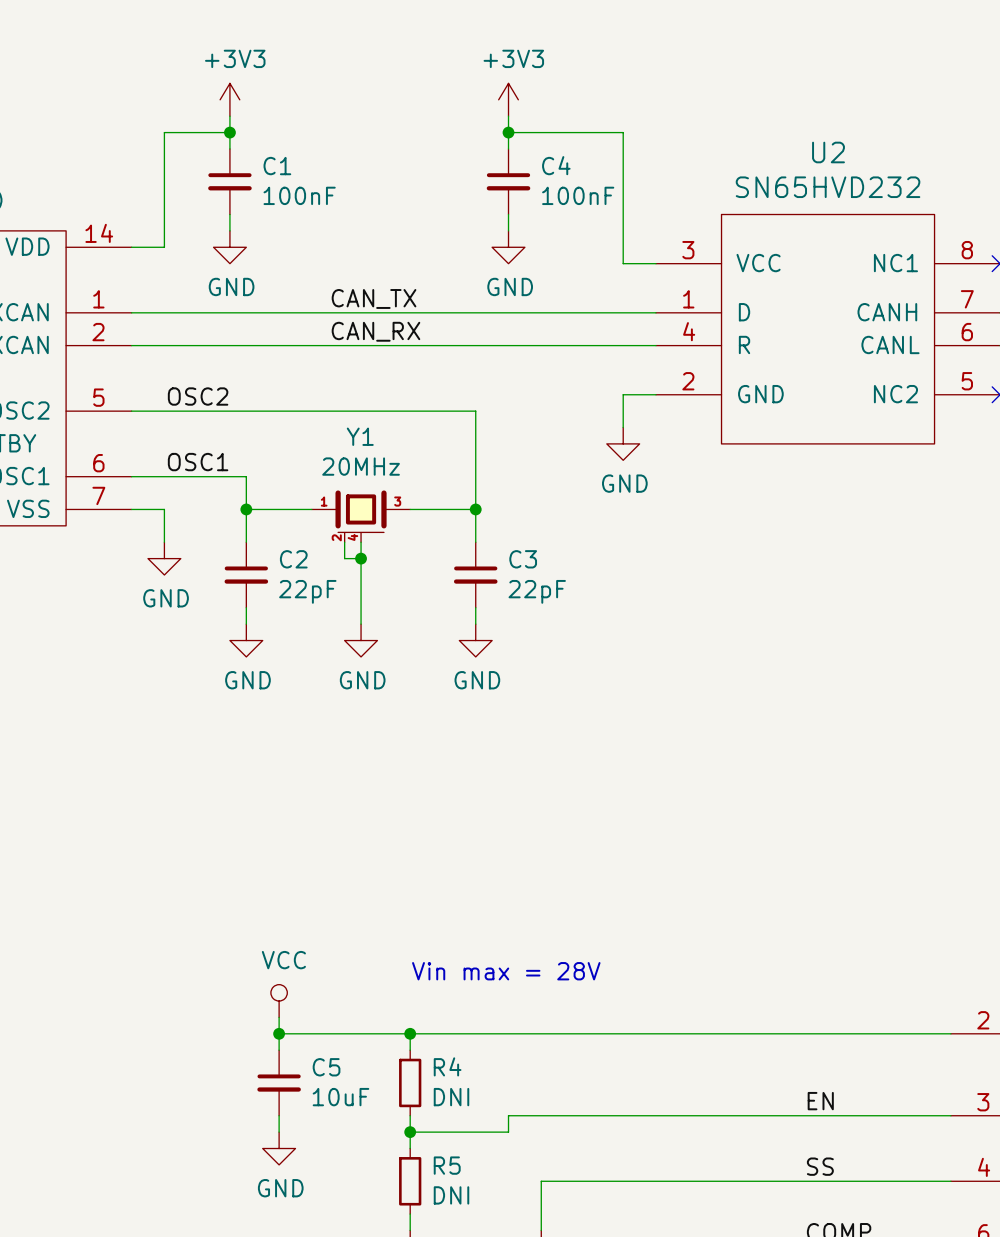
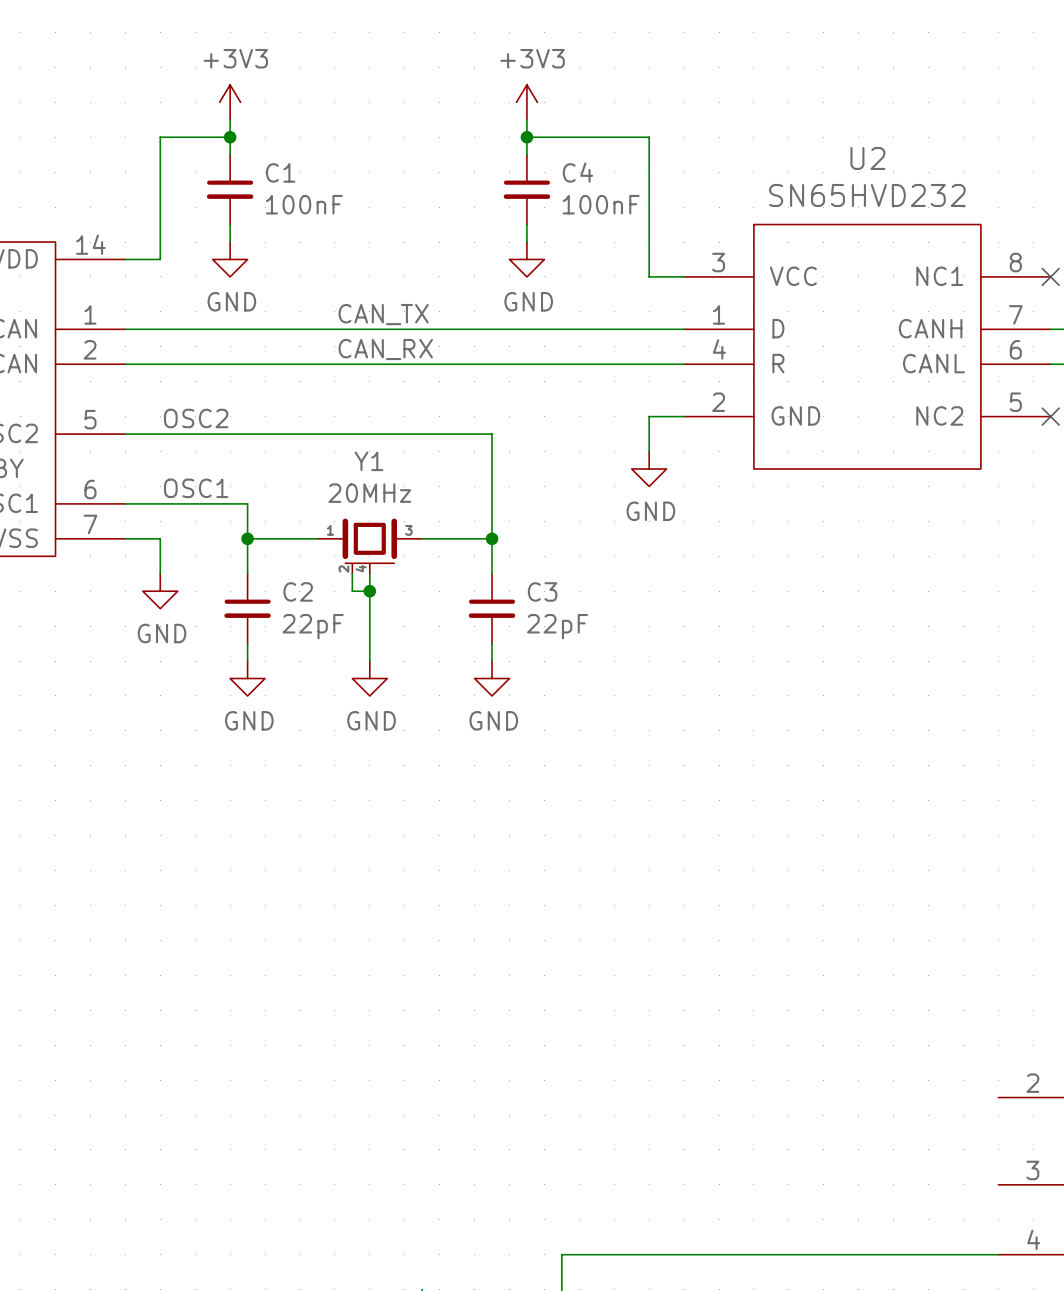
text: Vin max = 28V (506, 971) -> none
power symbol: VCC (279, 1001) -> none
wire: (279, 1017) (279, 1050) -> none
wire: (279, 1033) (950, 1033) -> none
junction: (279, 1033) -> none
wire: (410, 1033) (410, 1050) -> none
junction: (410, 1033) -> none
C5: 10uF (279, 1082) -> none
R4: DNI (410, 1082) -> none
label: EN (820, 1101) -> none
wire: (279, 1115) (279, 1132) -> none
wire: (410, 1115) (410, 1148) -> none
wire: (950, 1115) (508, 1115) (508, 1132) (410, 1132) -> none
junction: (410, 1132) -> none
power symbol: GND (279, 1148) -> none
label: SS (820, 1166) -> none
R5: DNI (410, 1181) -> none

